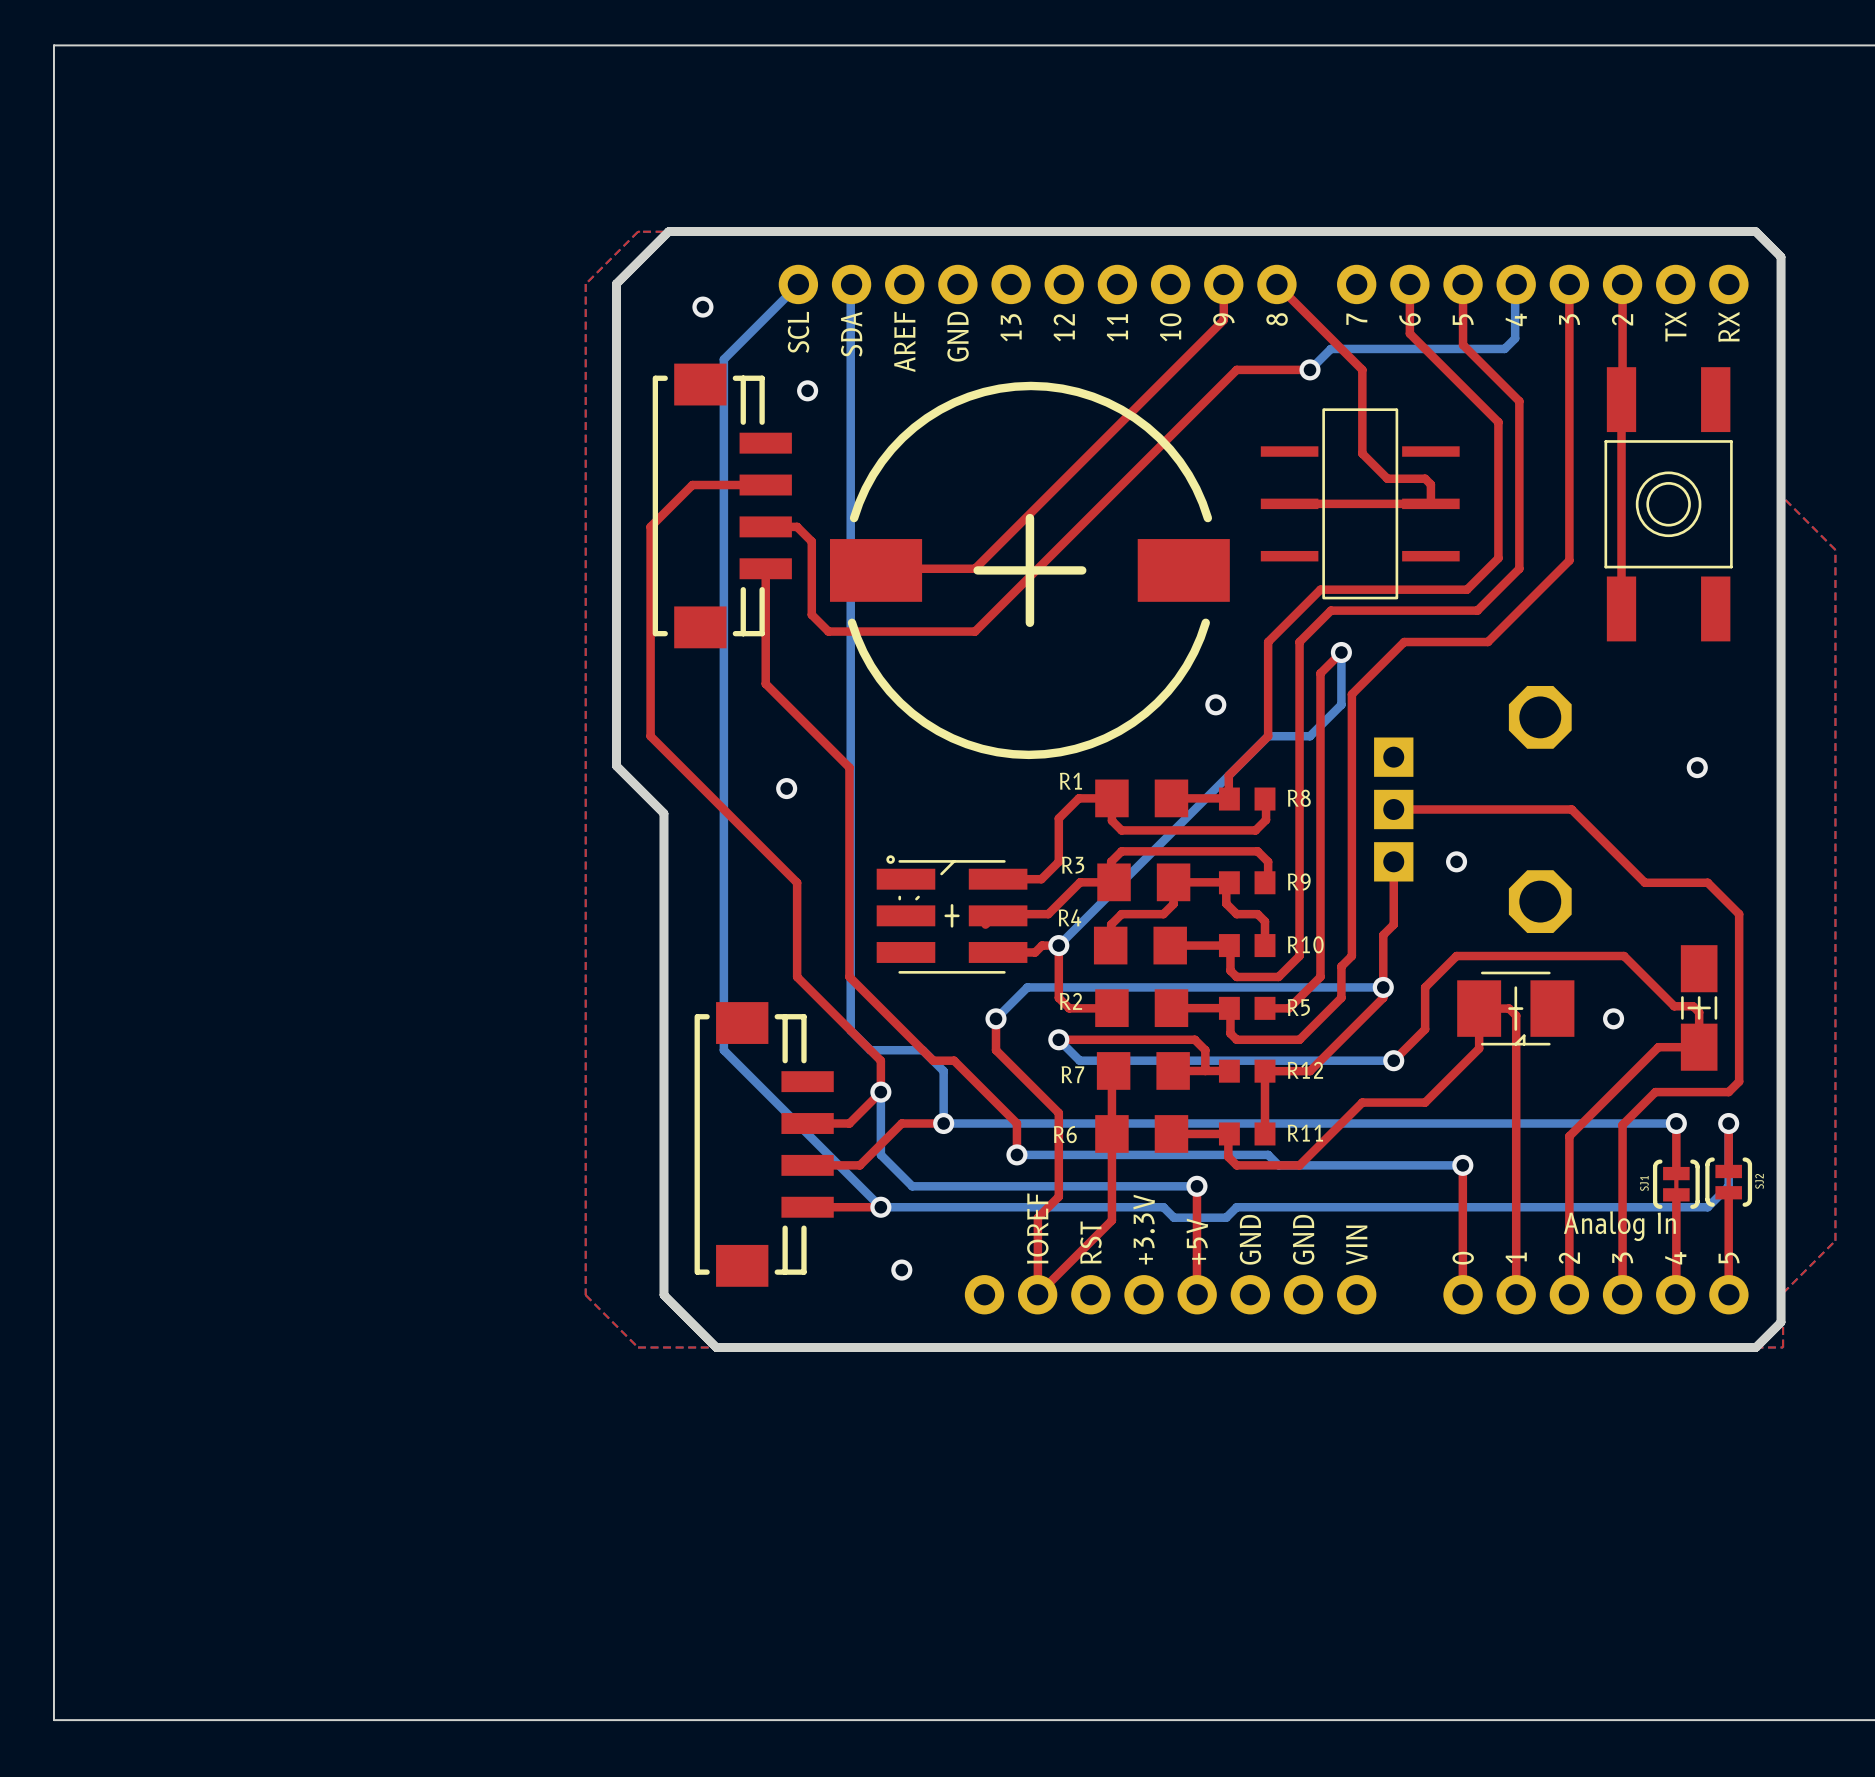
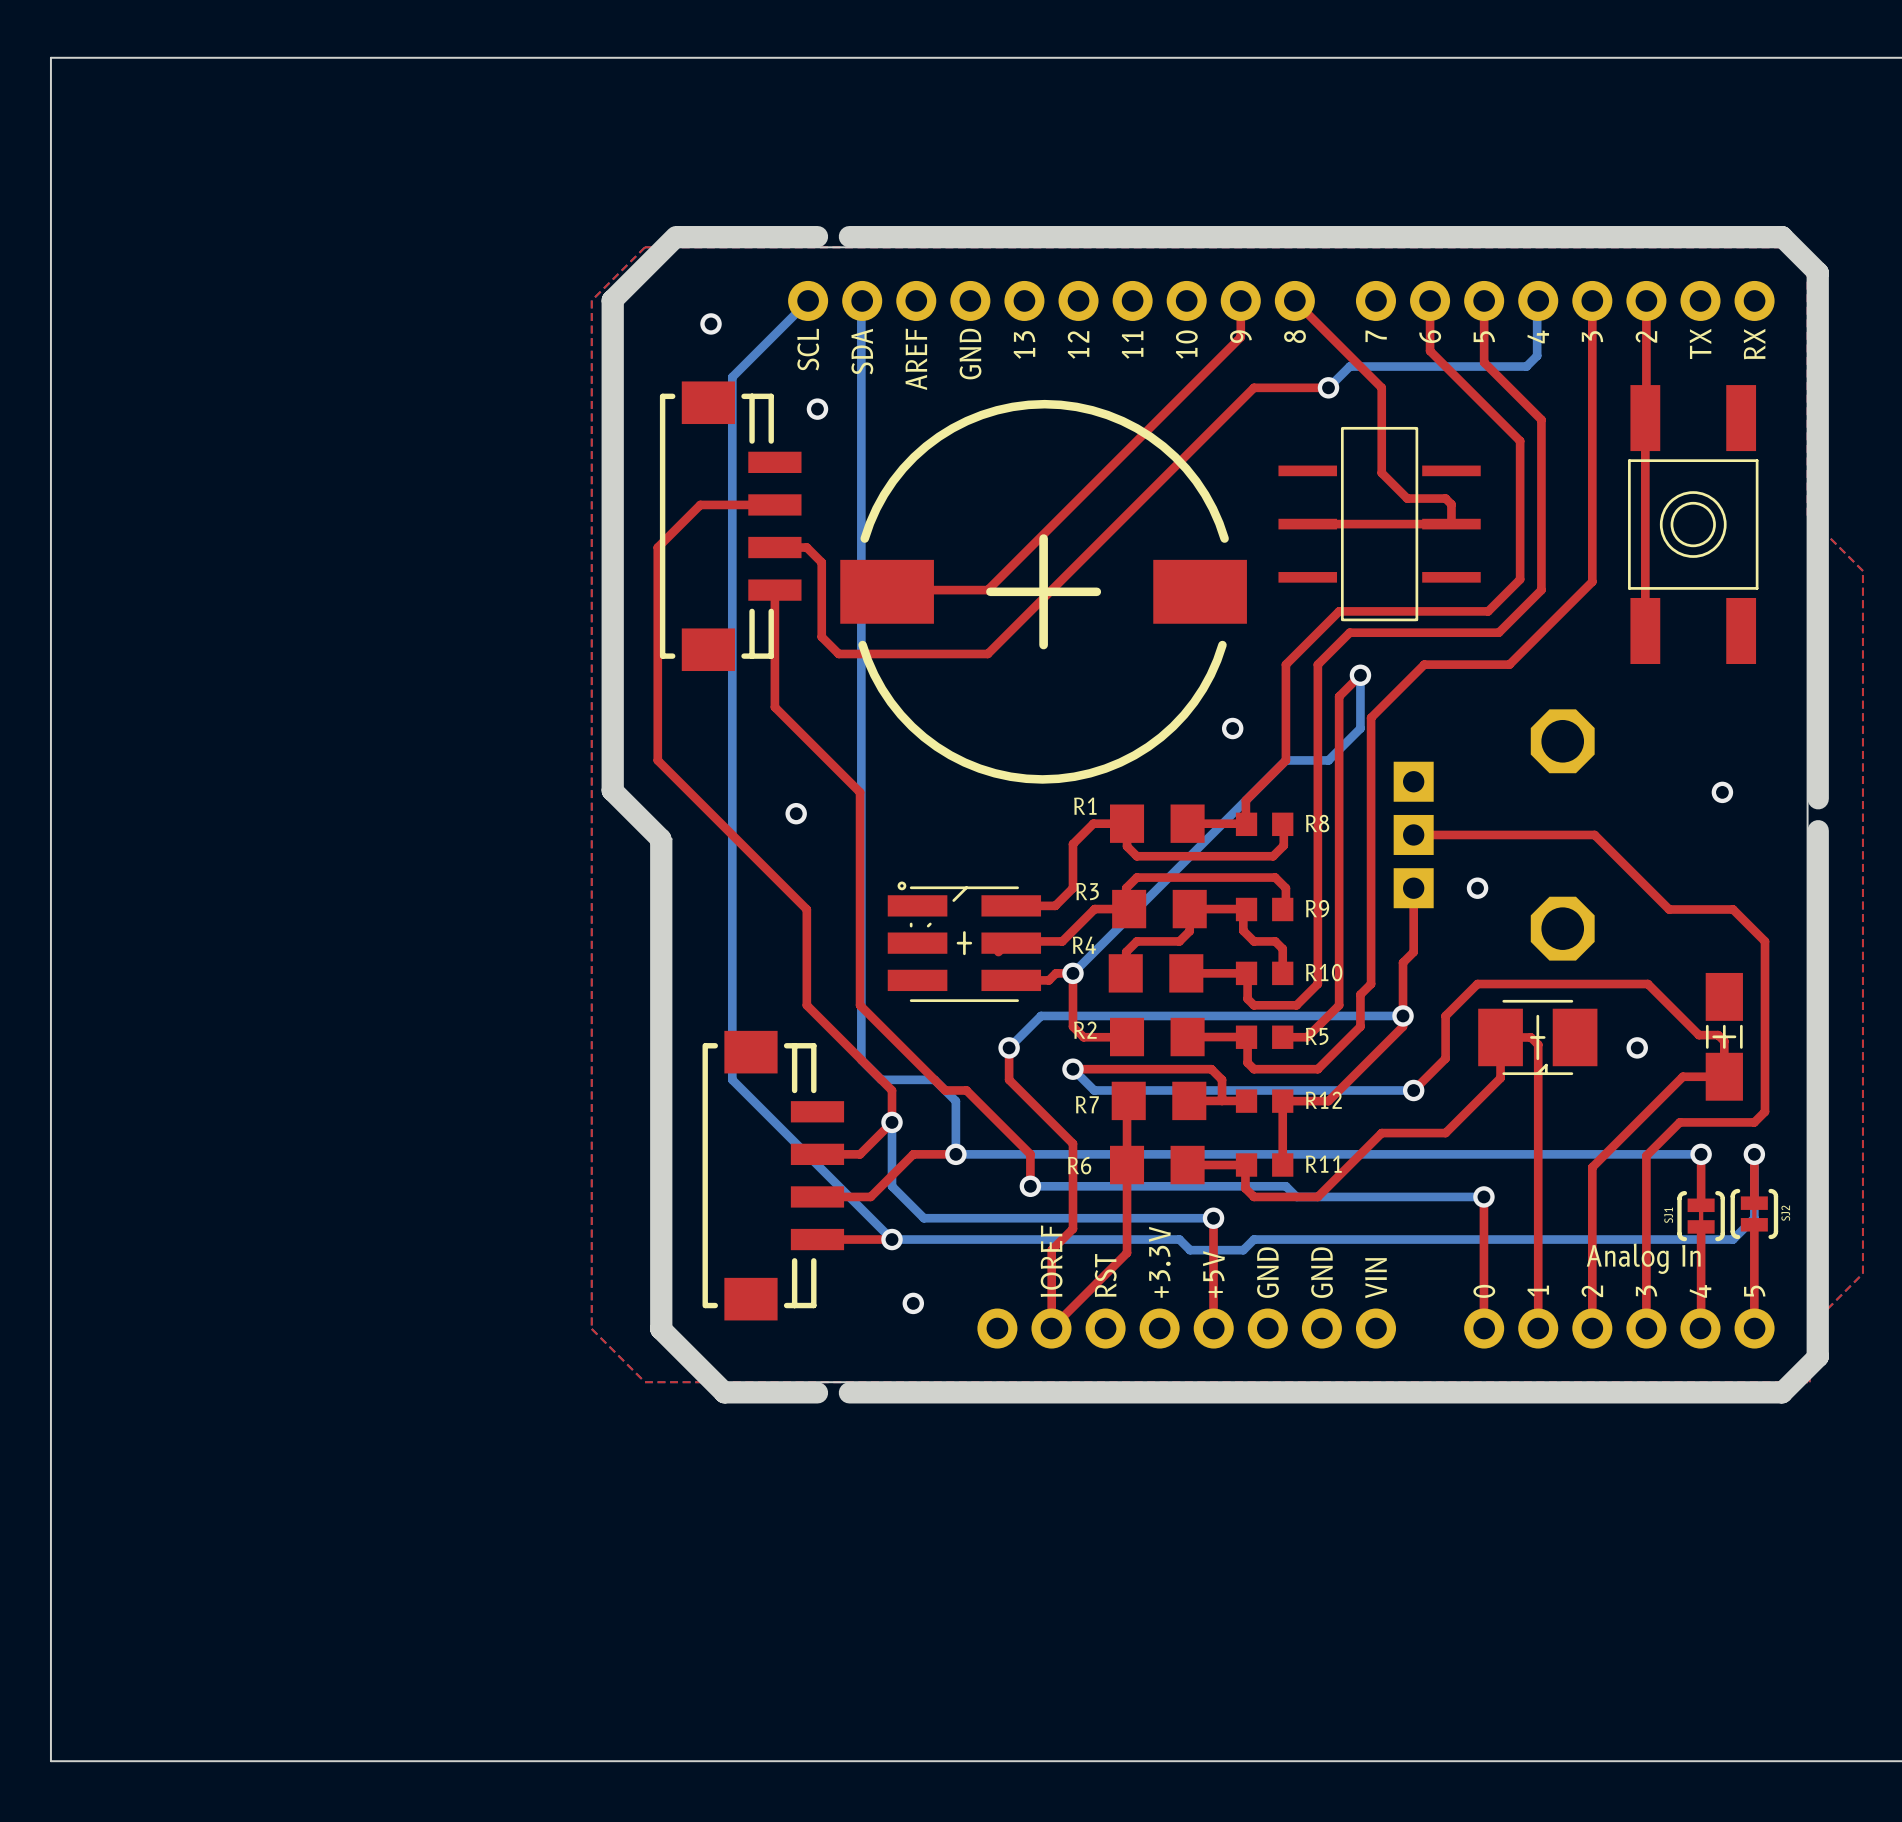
board edge: none -> (676, 236) (612, 300) (612, 790) (660, 839) (660, 1328) (724, 1392) (817, 1392)
board edge: none -> (679, 236) (817, 236)
board edge: none -> (849, 236) (1782, 236) (1818, 272) (1818, 798)
board edge width: thick (668, 231) (616, 284) (616, 765) (663, 813) (663, 1295) (716, 1347) (1755, 1347) (1781, 1322) (1781, 256) (1755, 231) (668, 231) -> thin (676, 247) (622, 300) (622, 790) (671, 839) (671, 1328) (724, 1382) (1782, 1382) (1807, 1356) (1807, 272) (1782, 247) (676, 247)
board edge: none -> (1818, 830) (1818, 1356) (1782, 1392) (849, 1392)

